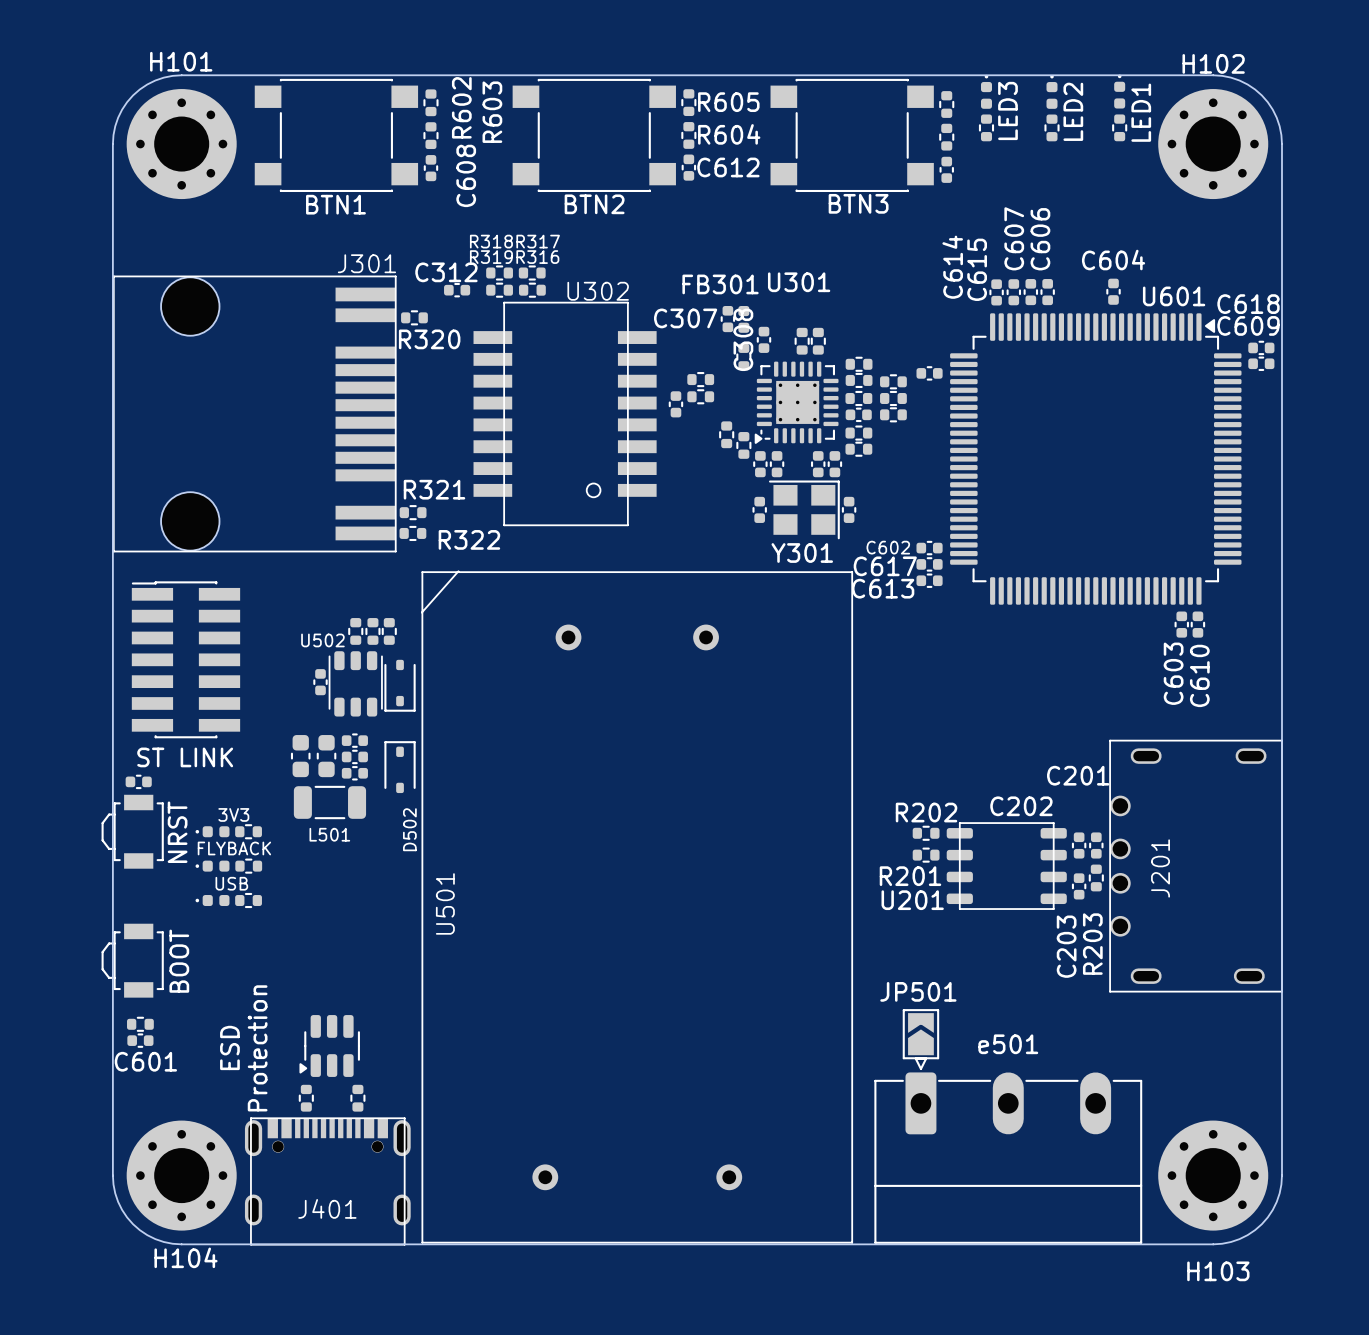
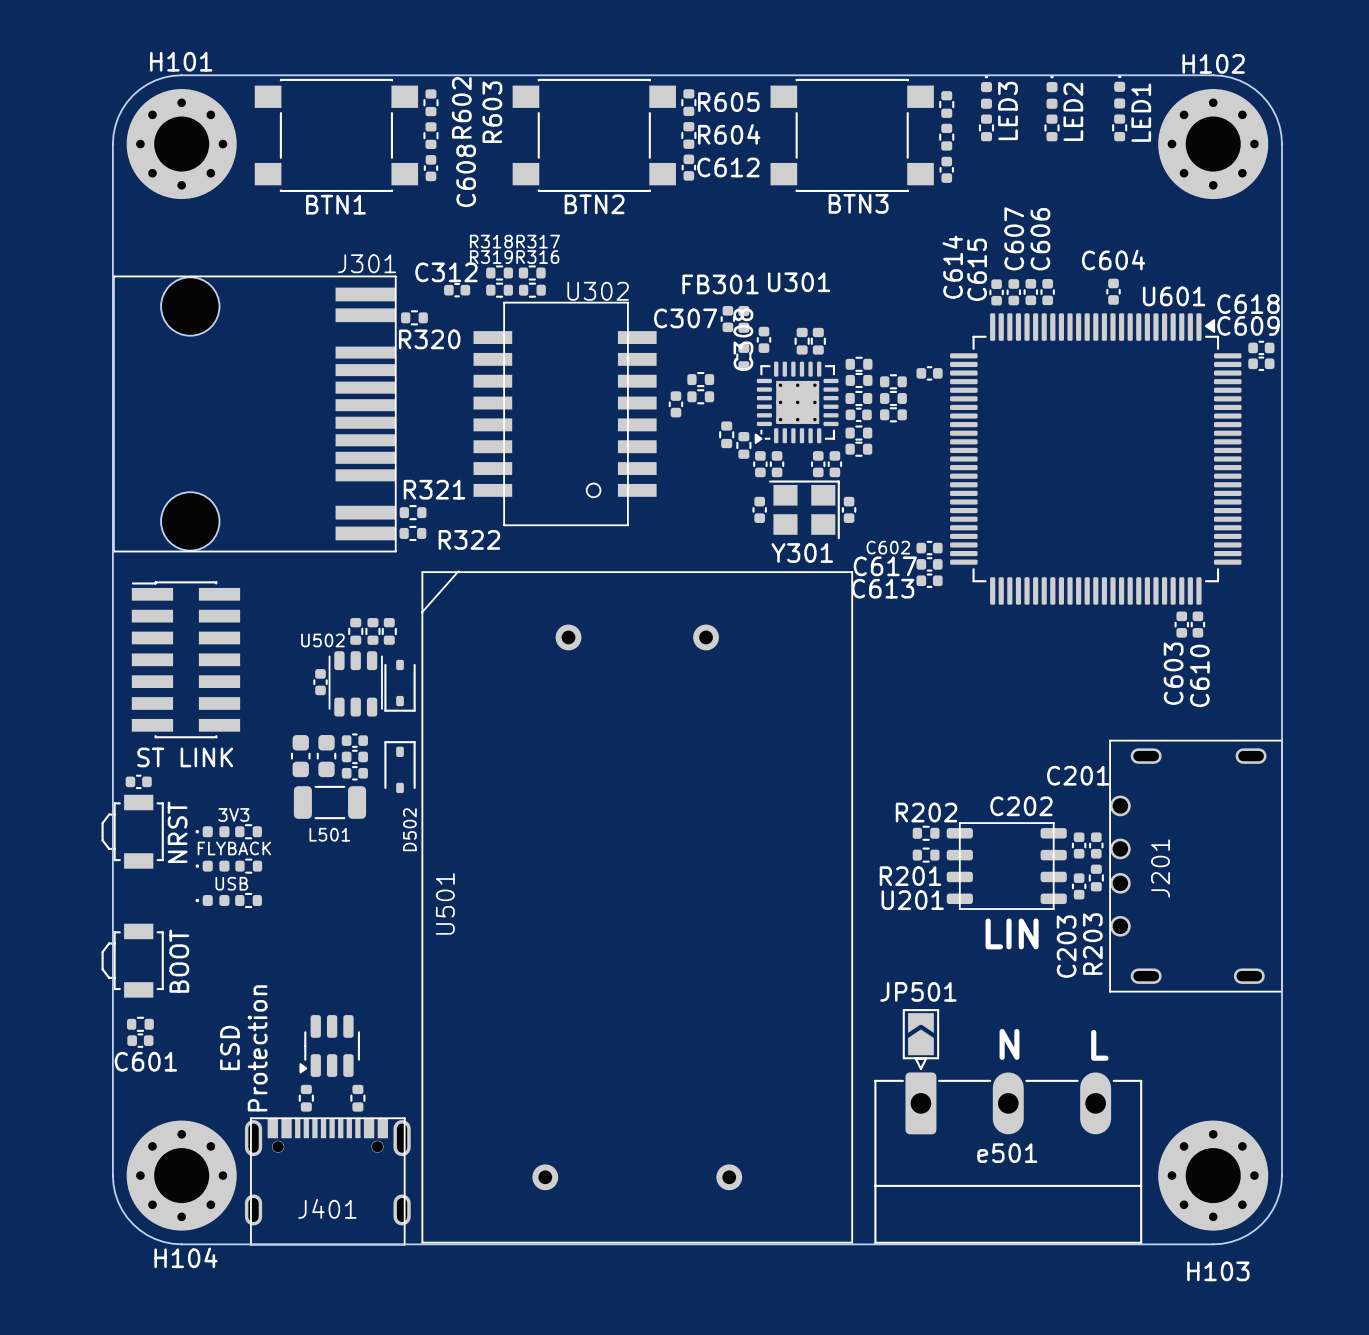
text: none -> LIN (1012, 933)
e501 name position: e501 (1008, 1044) -> e501 (1007, 1153)
text: none -> N (1009, 1044)
text: none -> L (1099, 1045)

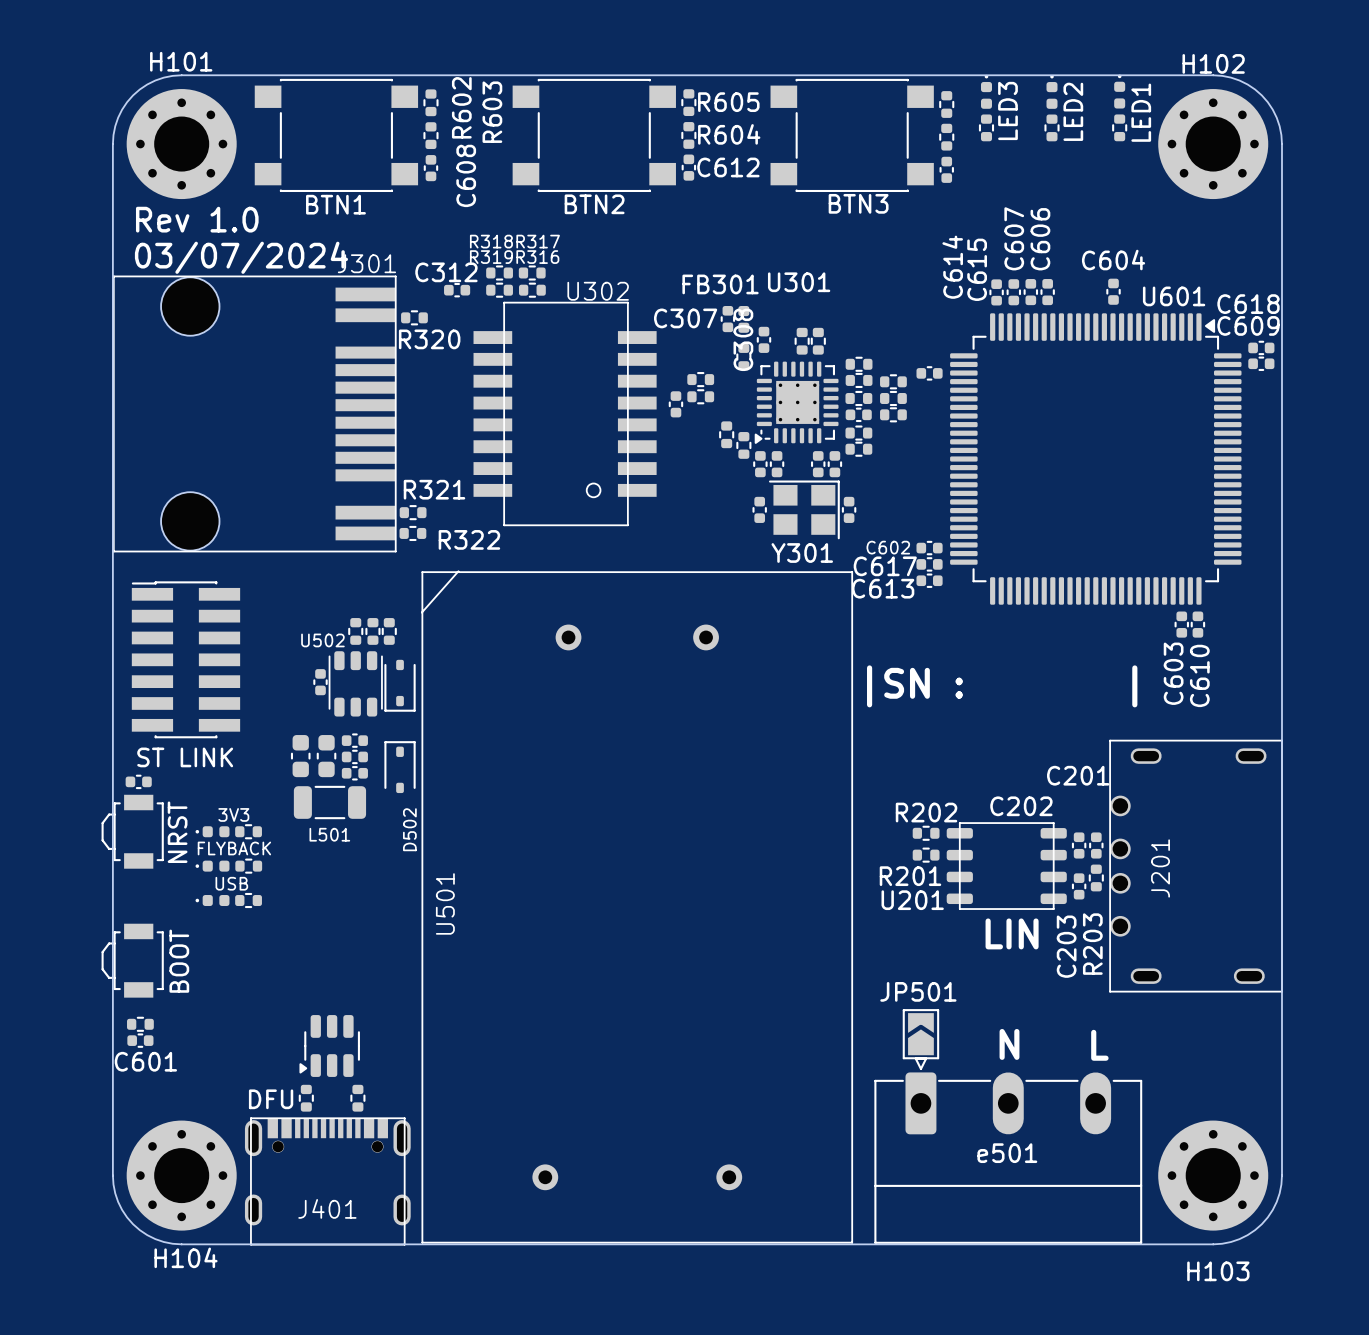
text: none -> Rev 1.0 (197, 219)
text: none -> 03/07/2024 (241, 257)
text: none -> |SN : | (1002, 686)
text: ESD (229, 1047) -> none
text: Protection (257, 1048) -> none
text: none -> DFU (271, 1099)

